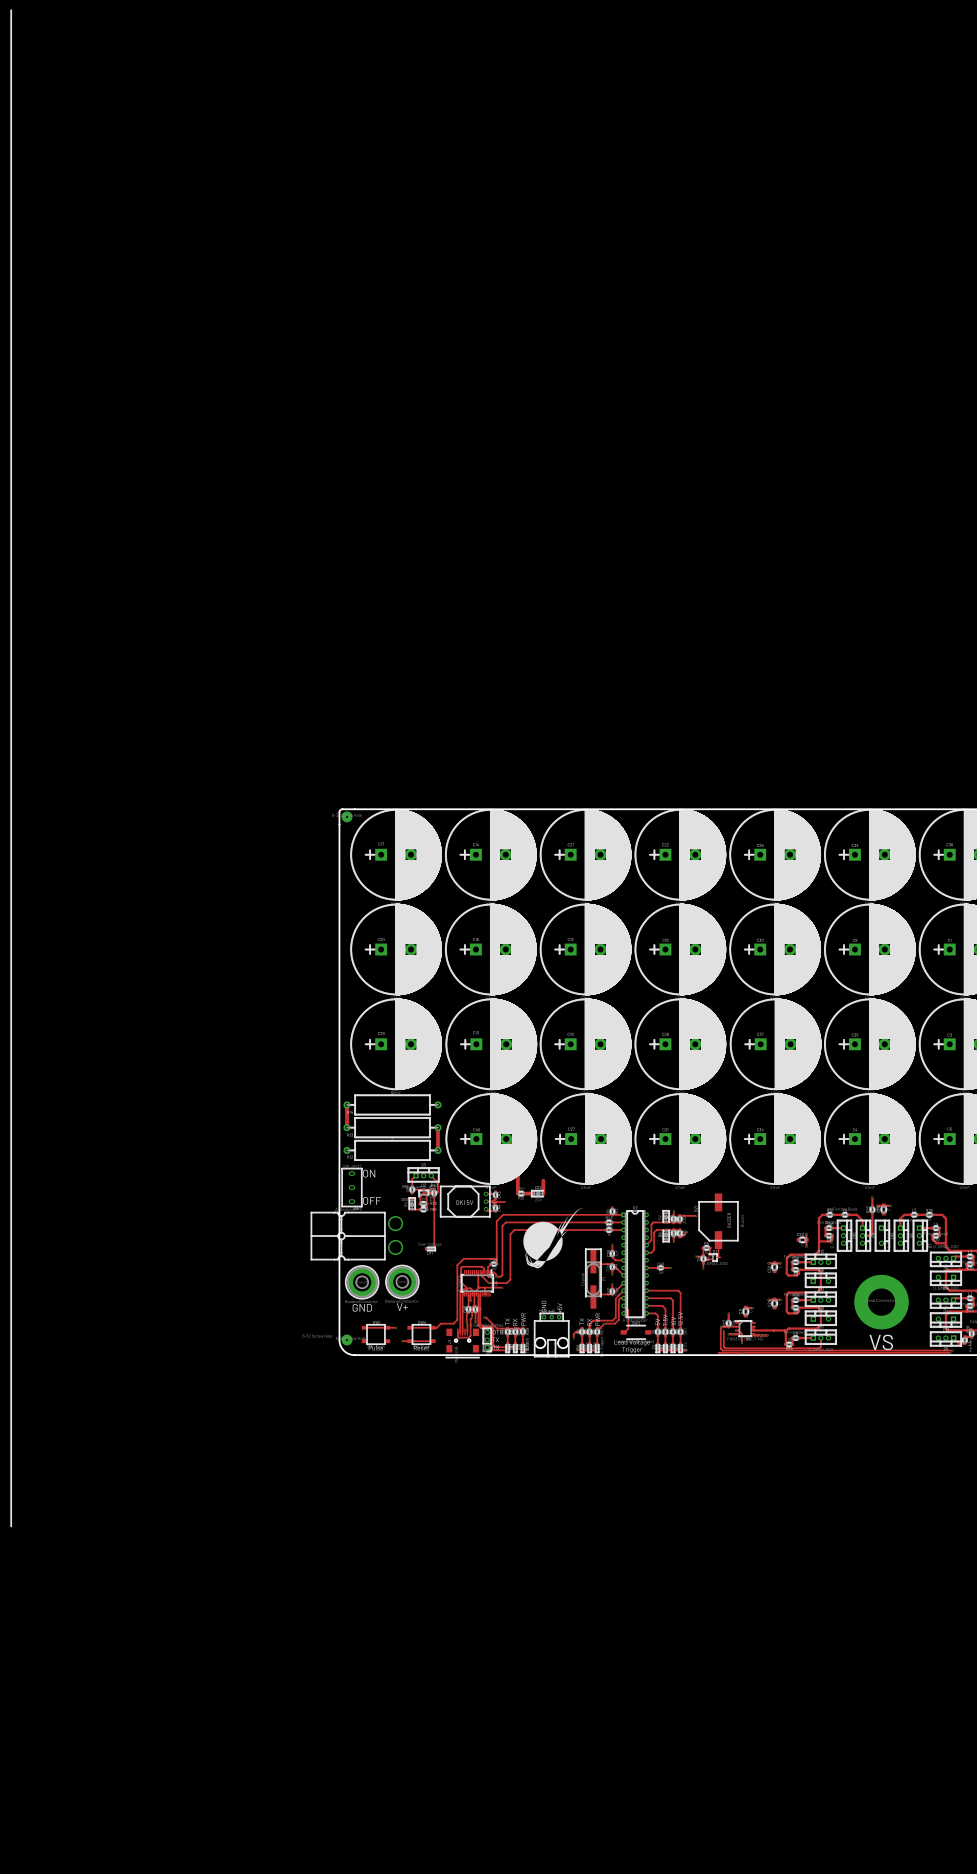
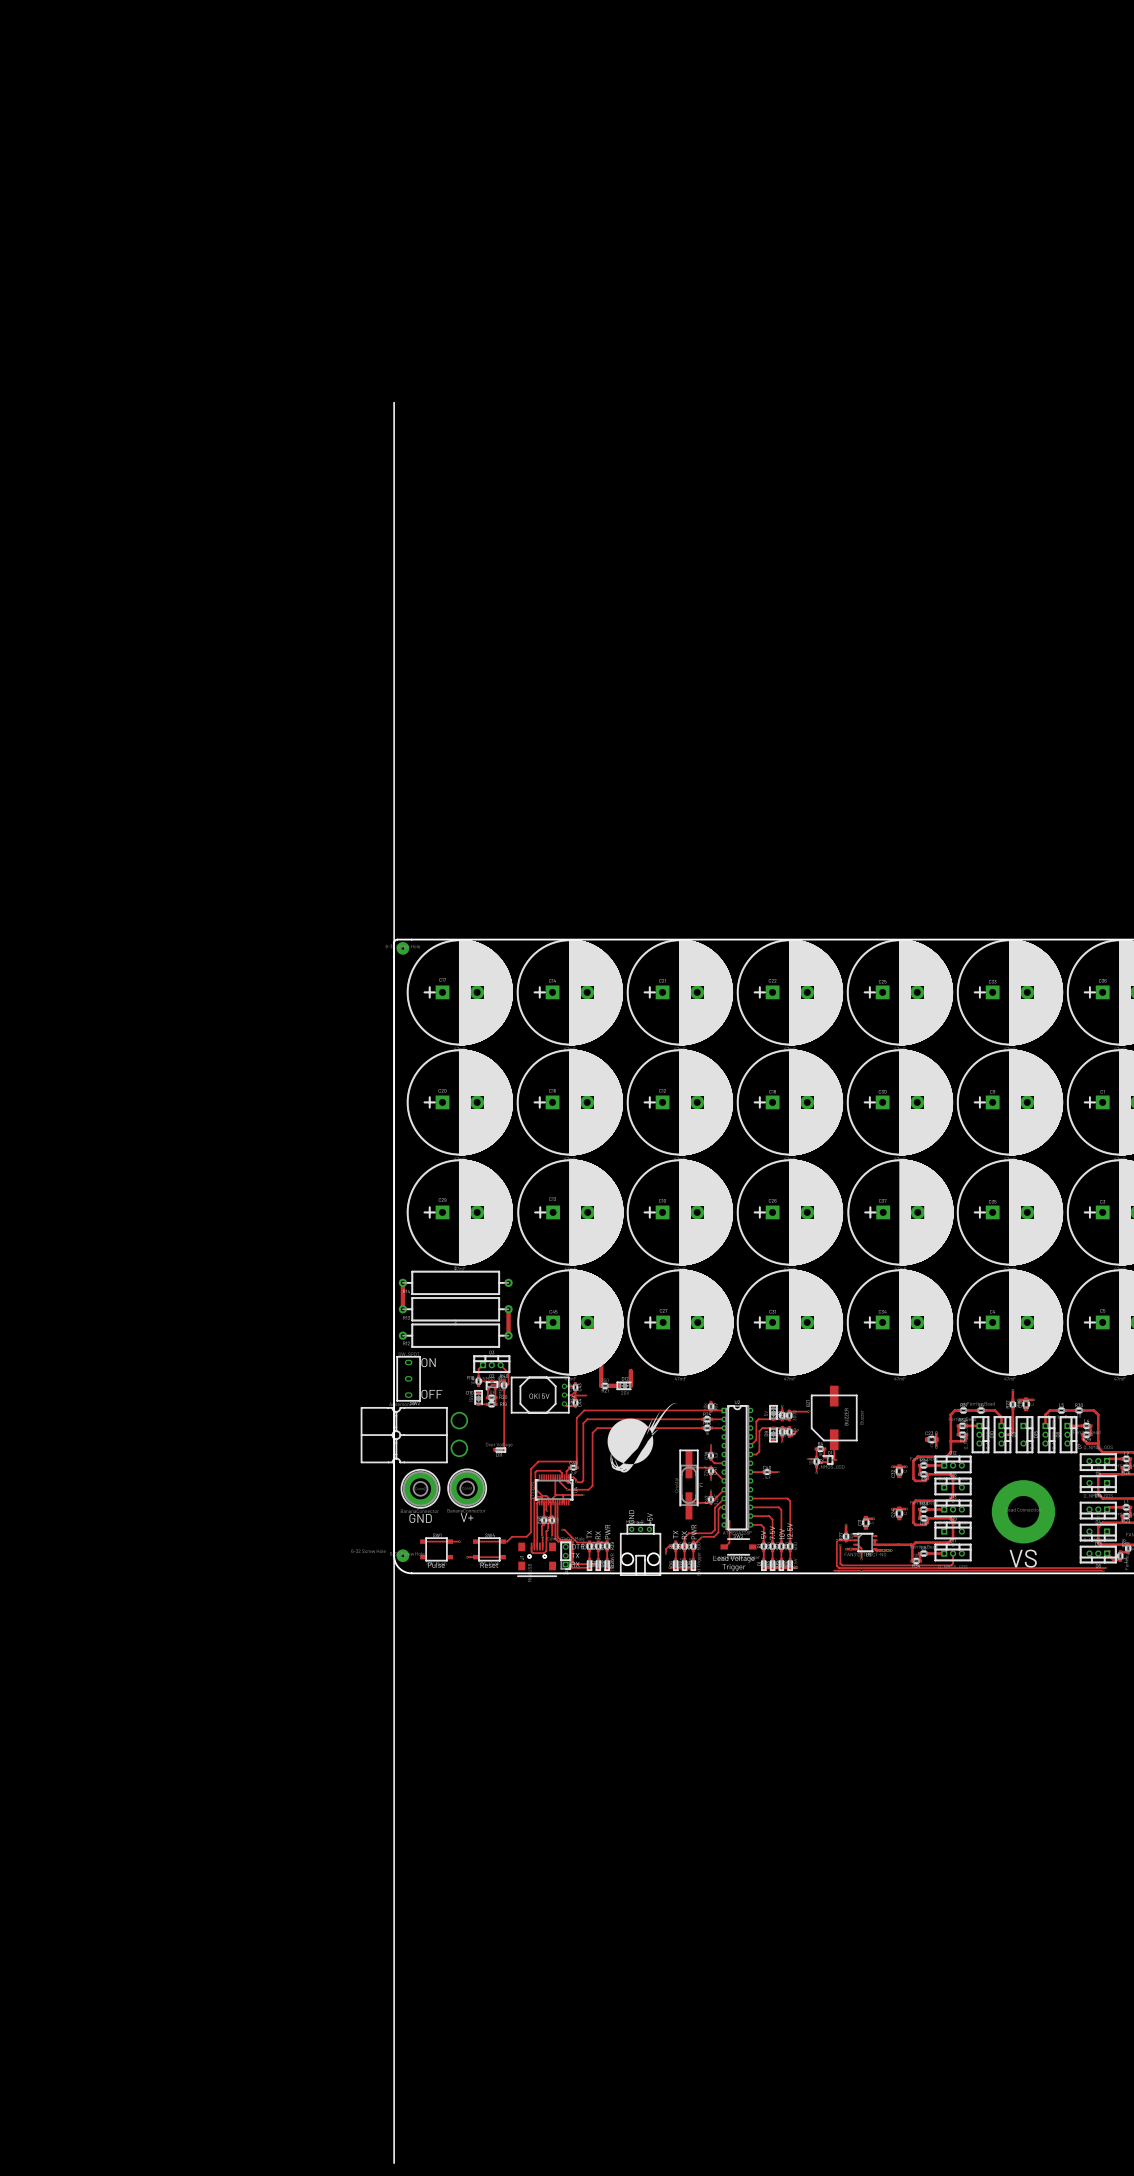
line: (11, 10) (11, 1526) -> none
line: none -> (394, 402) (394, 2163)

